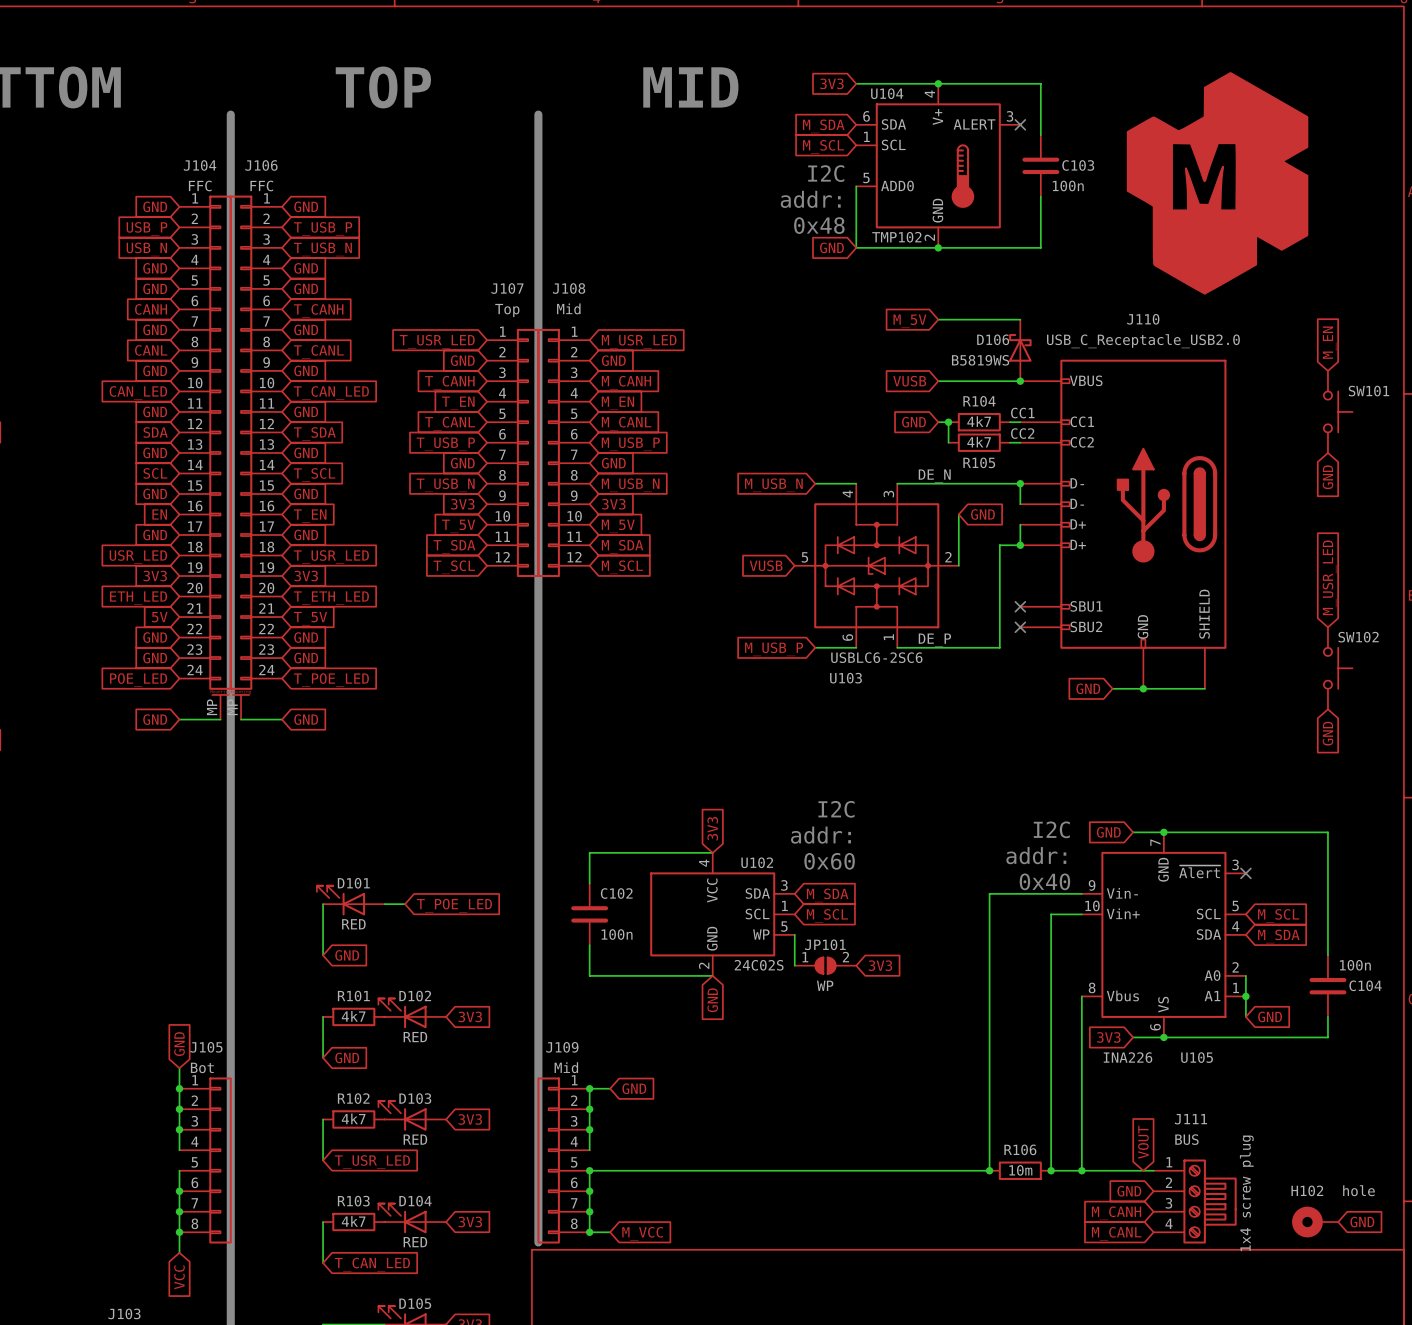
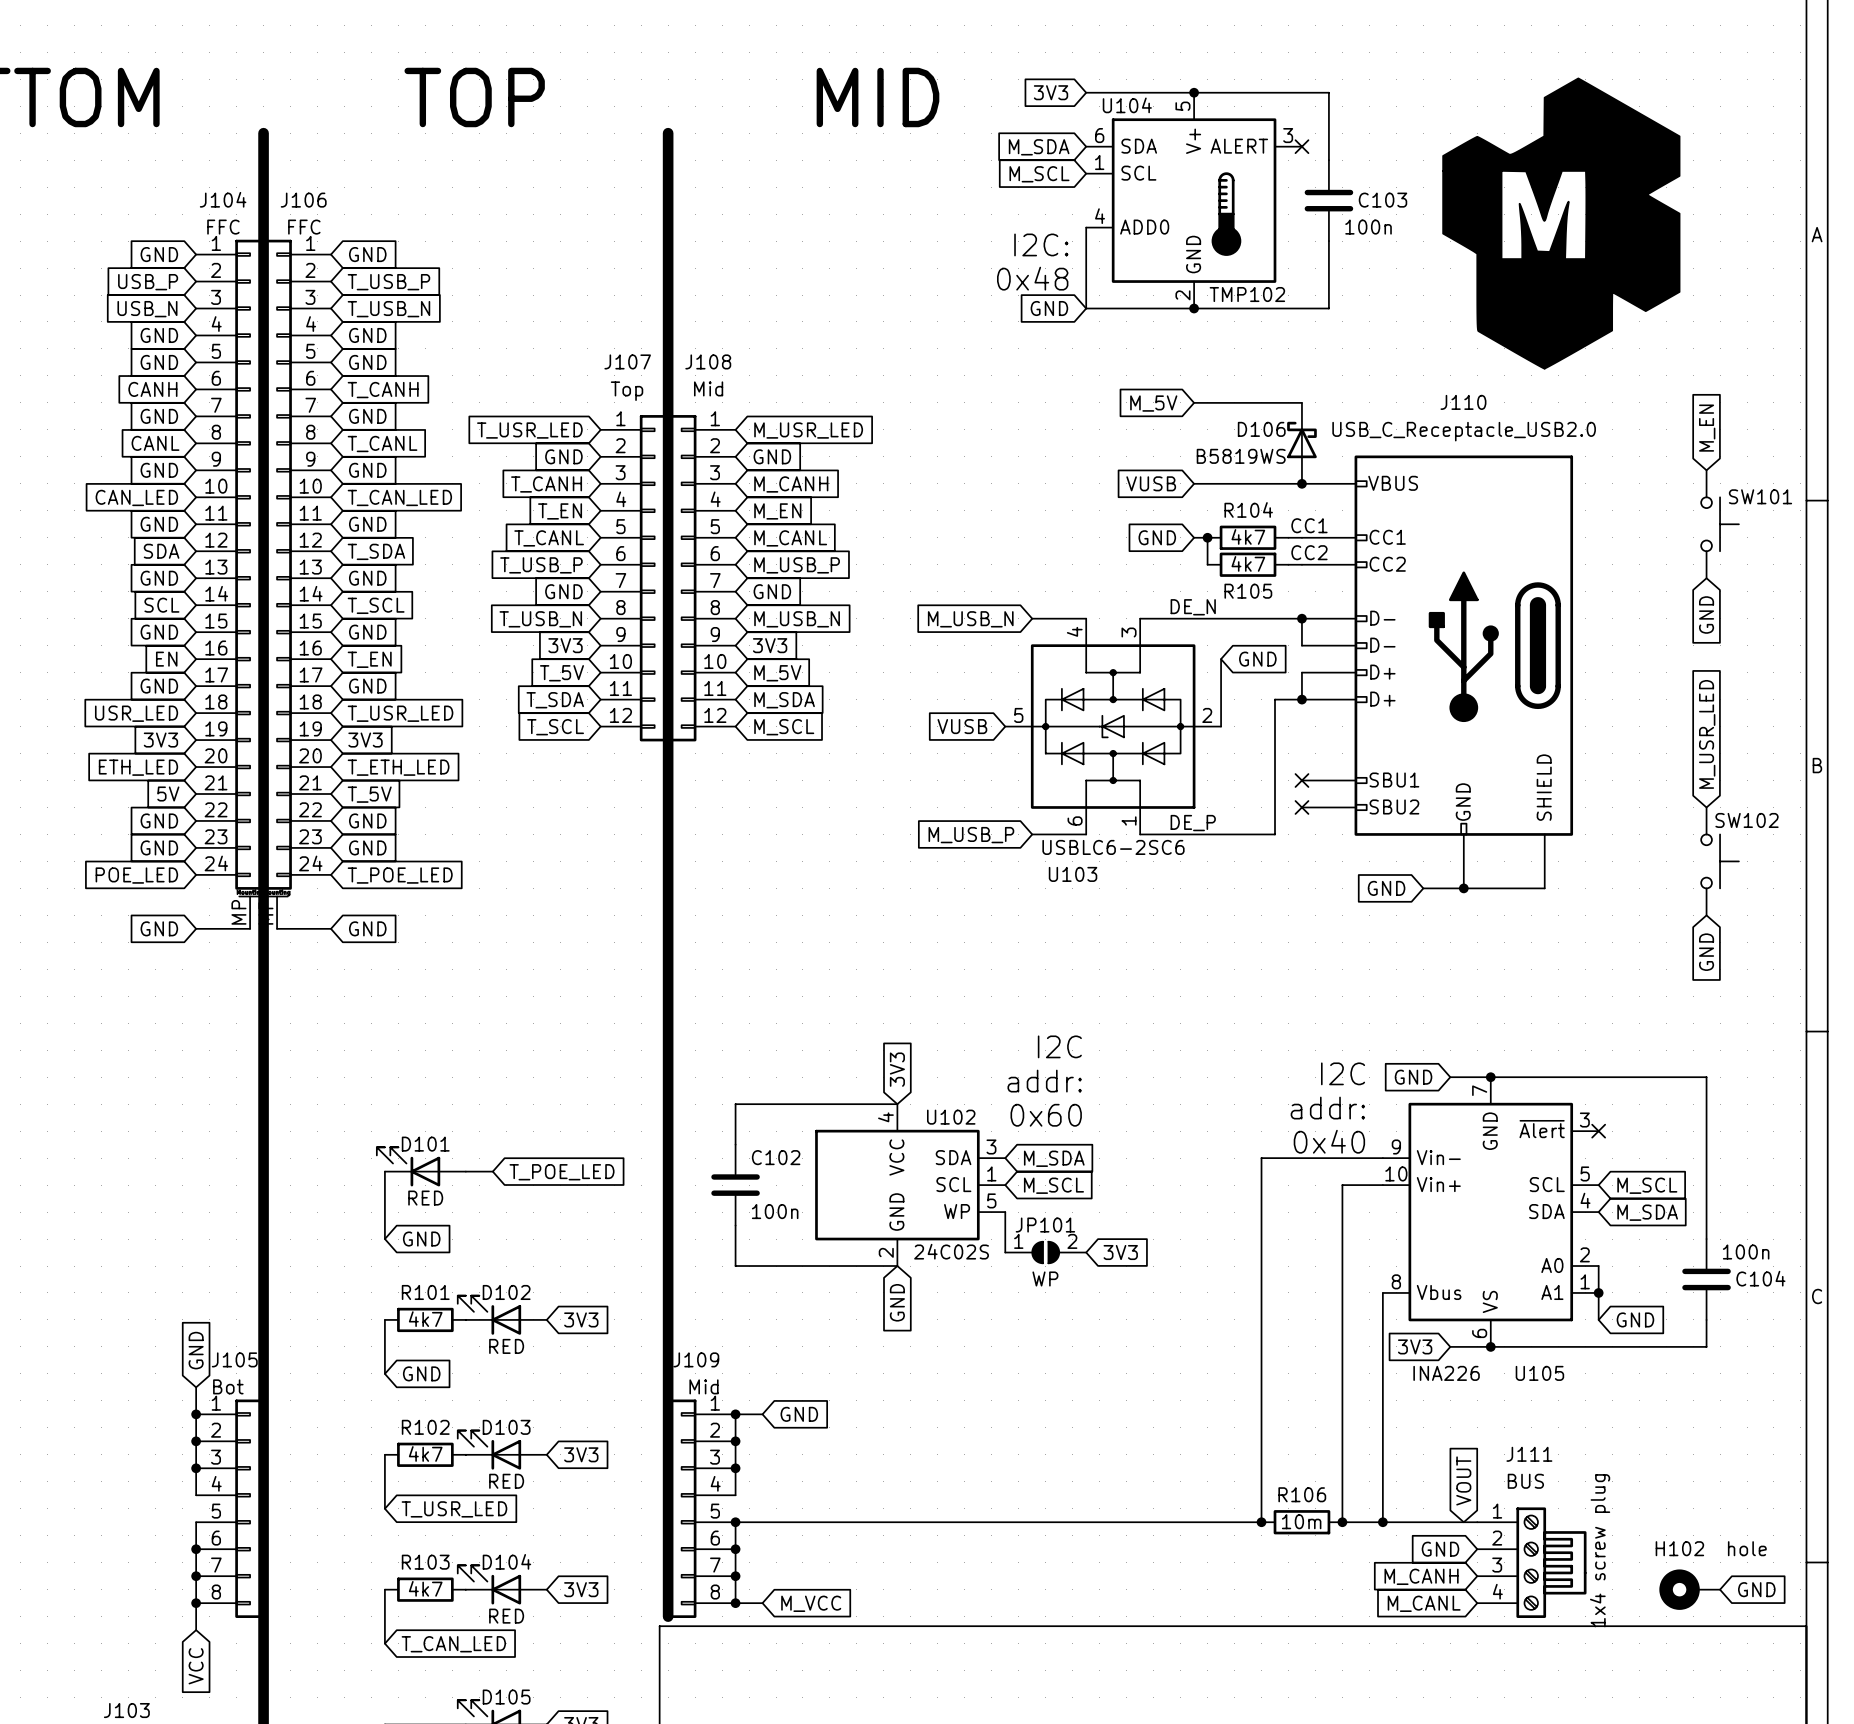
U104 pin number: 4 (929, 94) -> 5 (1182, 106)
text: I2C (826, 173) -> none
U104 pin number: 5 (866, 178) -> 4 (1100, 216)
text: addr: (810, 199) -> I2C: (1041, 244)
U104 value position: TMP102 (896, 237) -> TMP102 (1247, 294)

